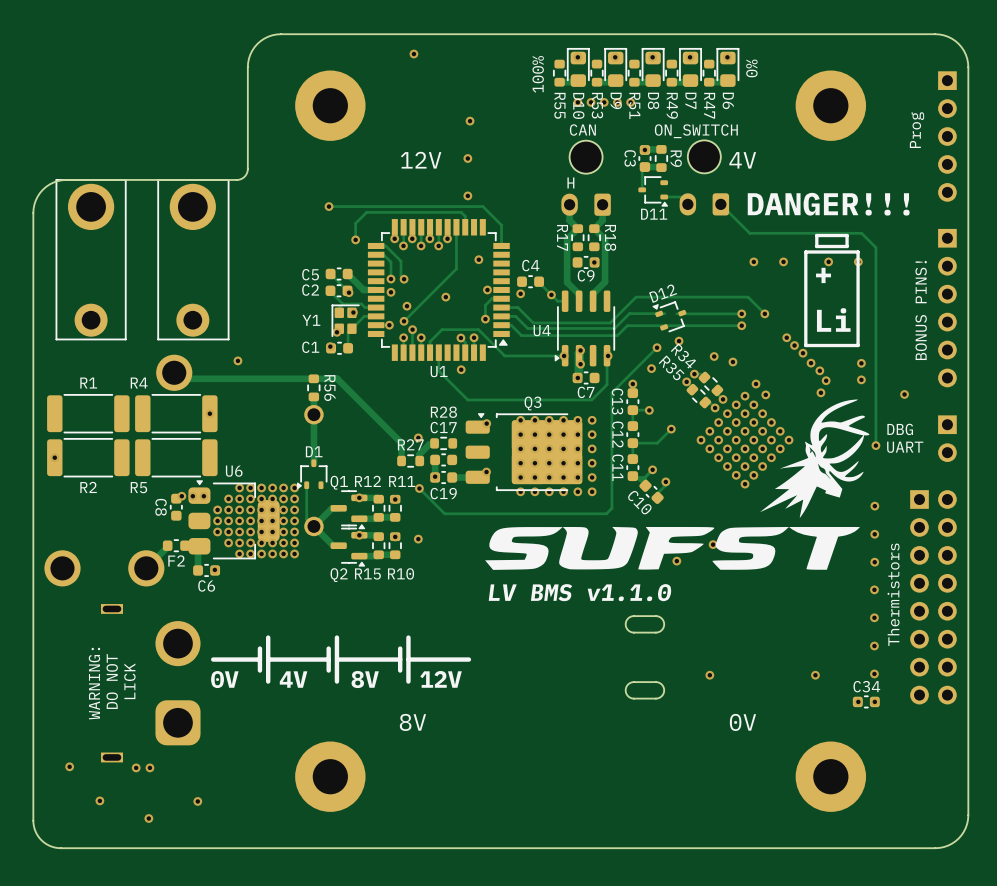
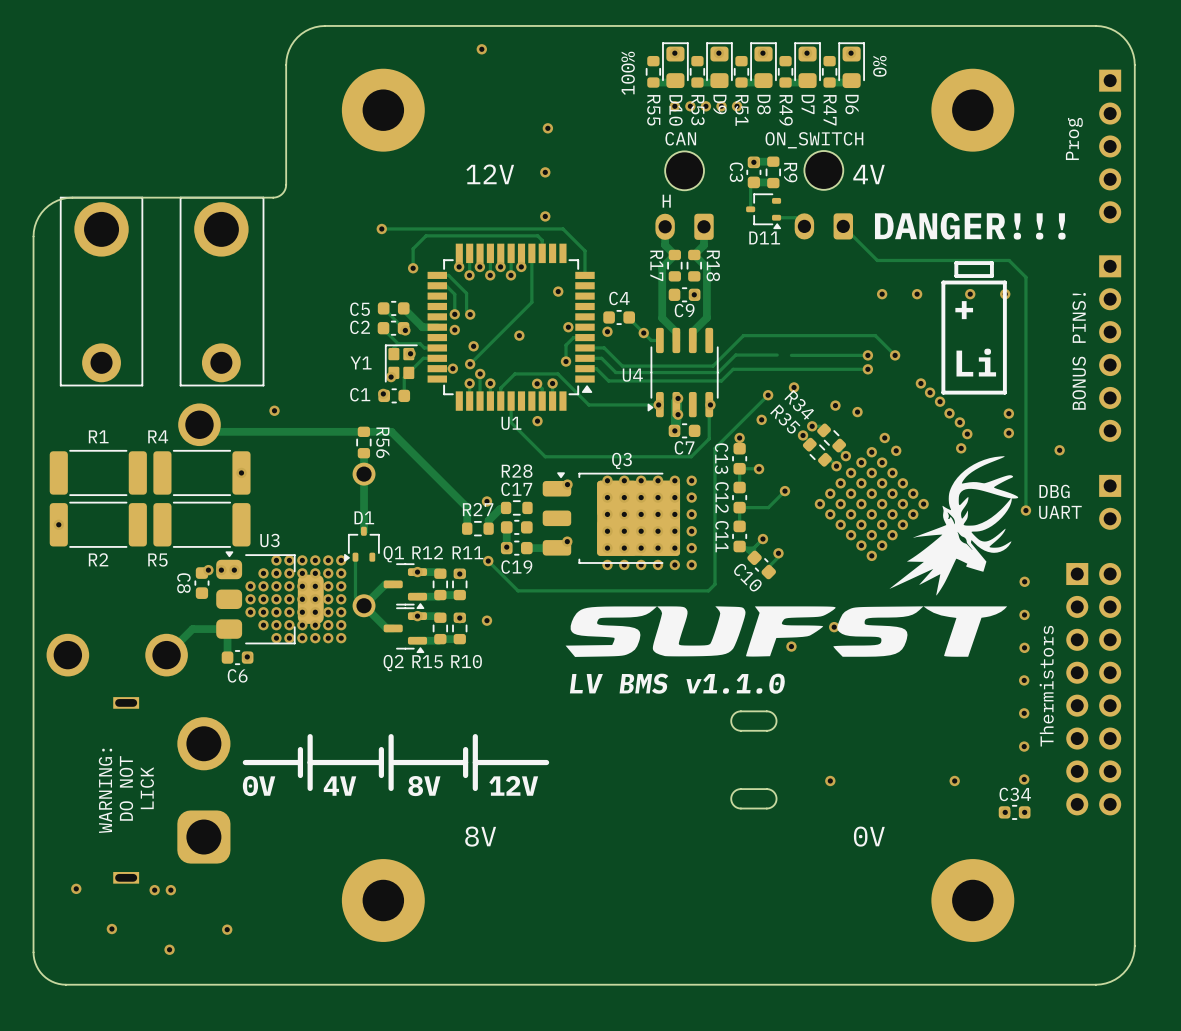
D12: (669, 316) -> none
U6 name: U6 (234, 471) -> U3 (269, 540)
F2: (176, 545) -> none
track: none -> (229, 629) (192, 629)

